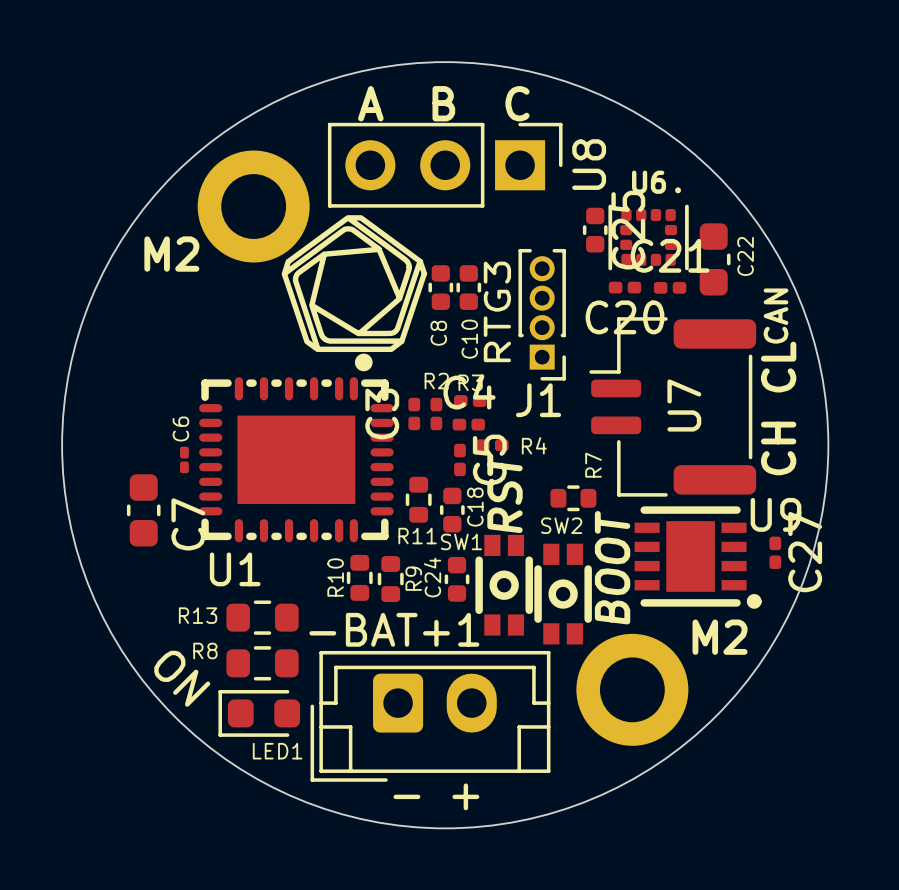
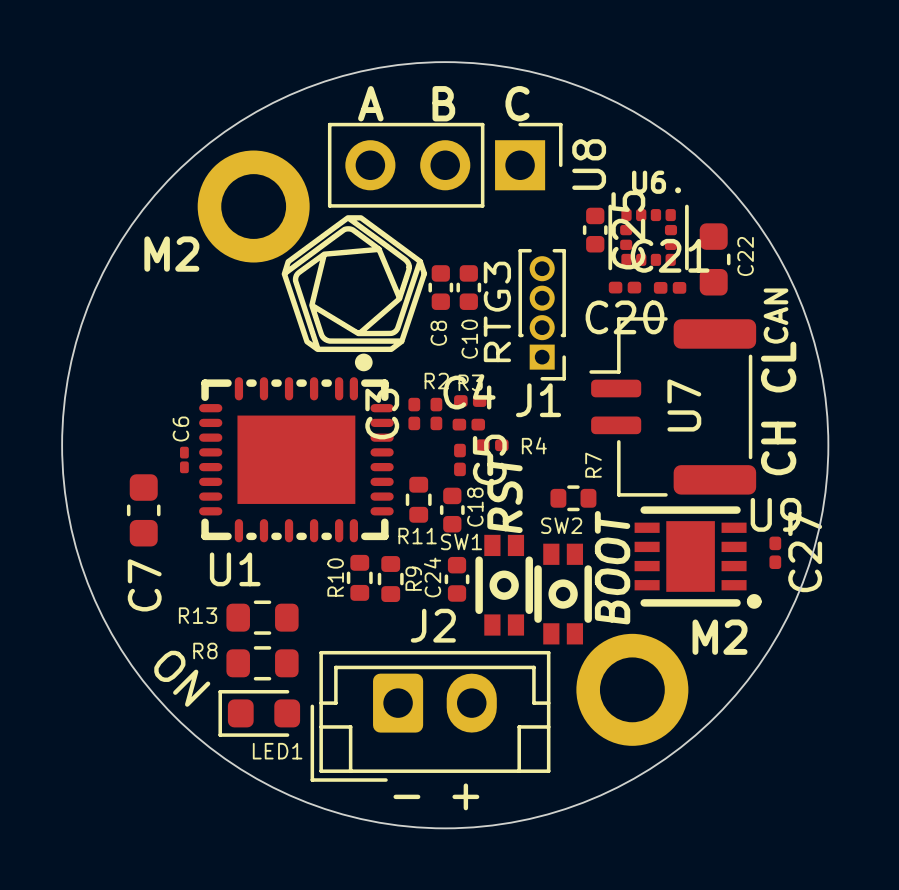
C7 name position: C7 (188, 524) -> C7 (144, 585)
-BAT+1 name: -BAT+1 (394, 629) -> J2 (433, 625)

